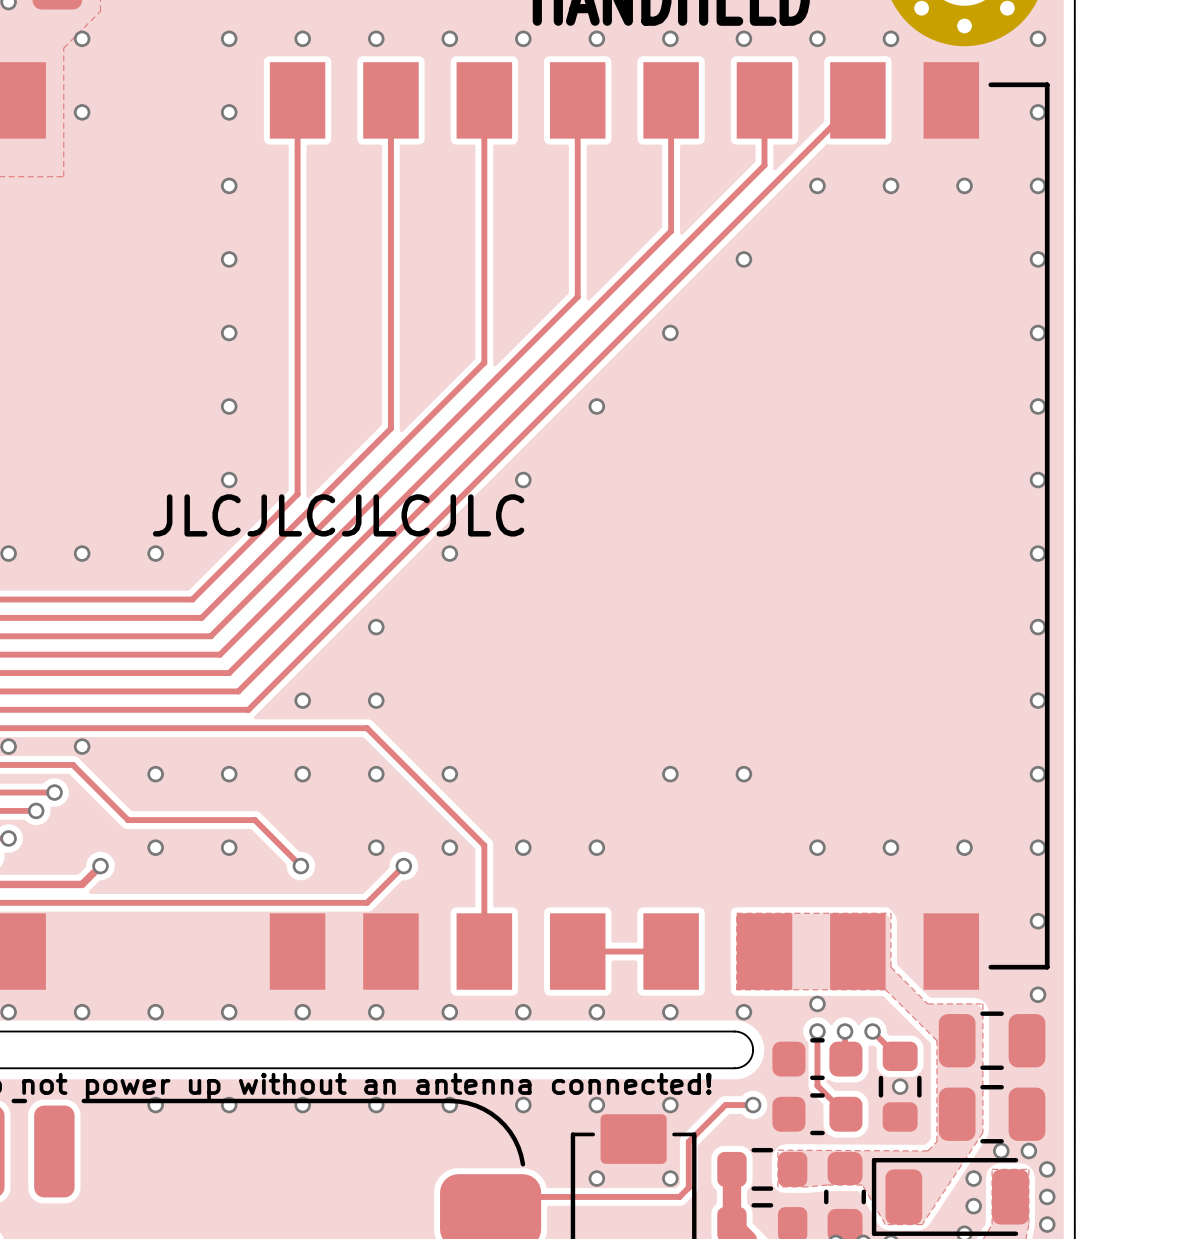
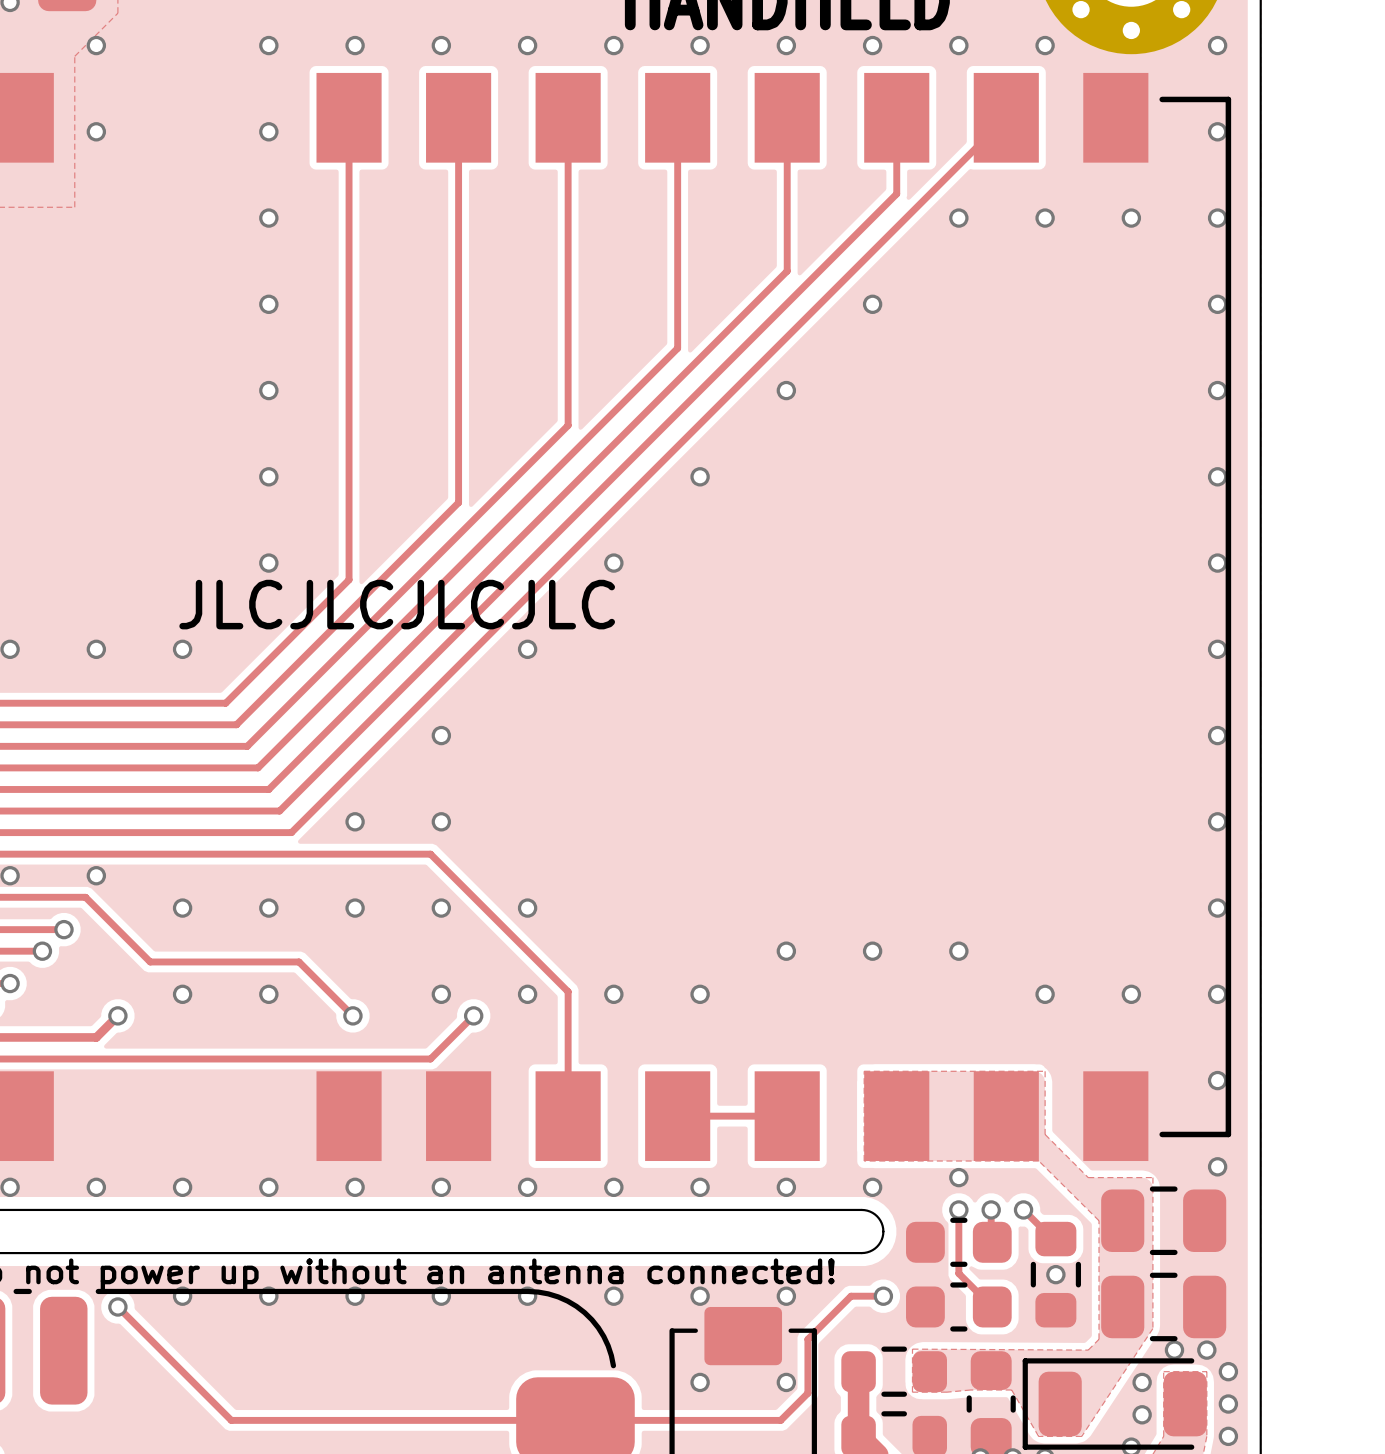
via position: (670, 774) -> (786, 951)
via position: (743, 774) -> (872, 951)
via position: (817, 847) -> (958, 951)
via: none -> (117, 1306)
track: (679, 1196) (504, 1196) (490, 1210) -> (797, 1404) (780, 1420) (231, 1420) (117, 1306)

